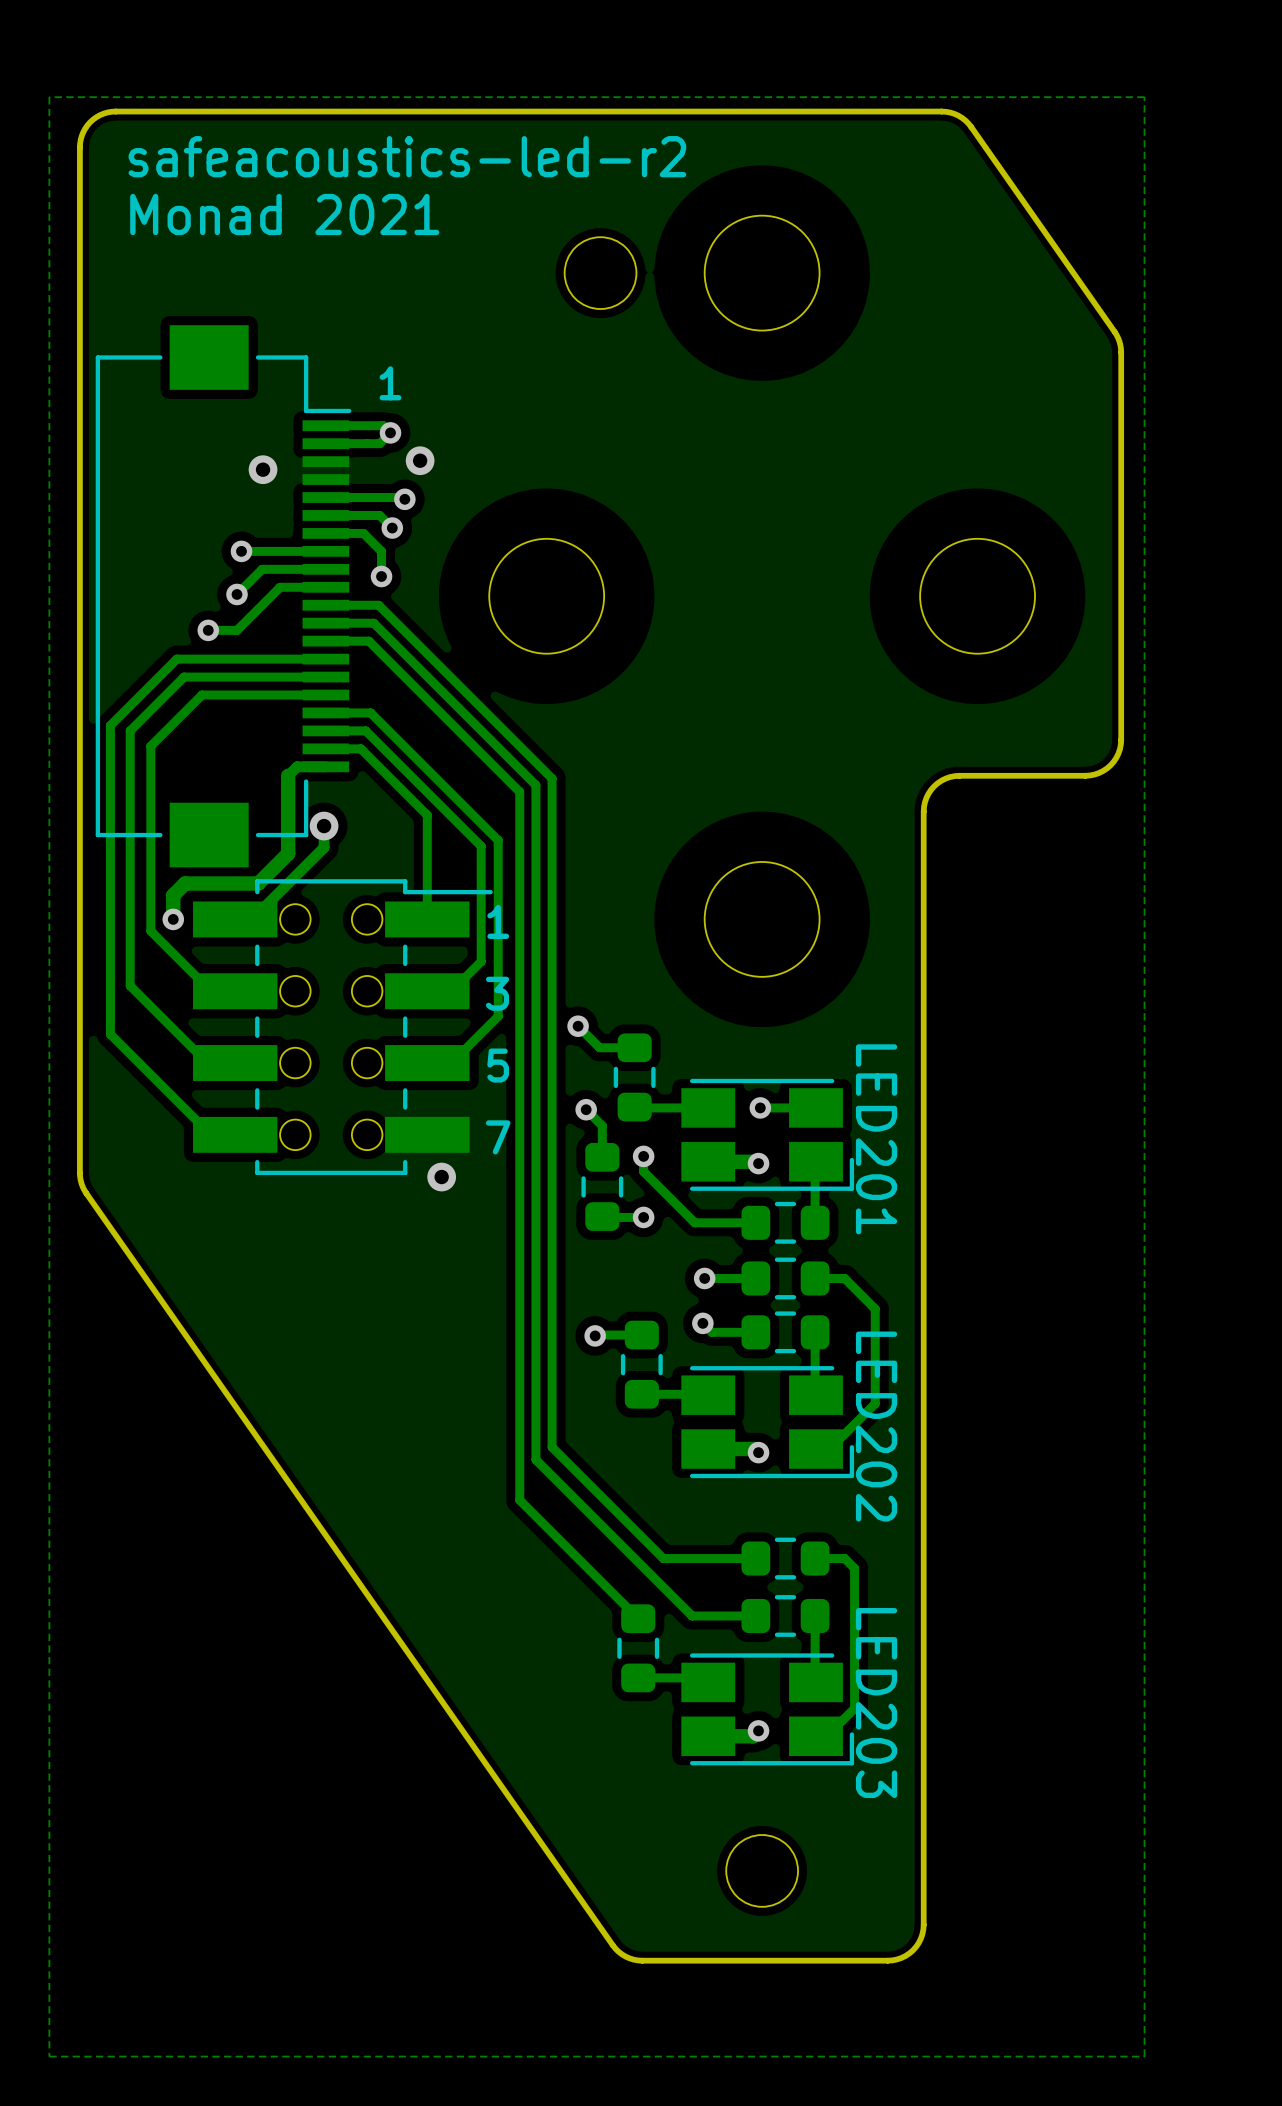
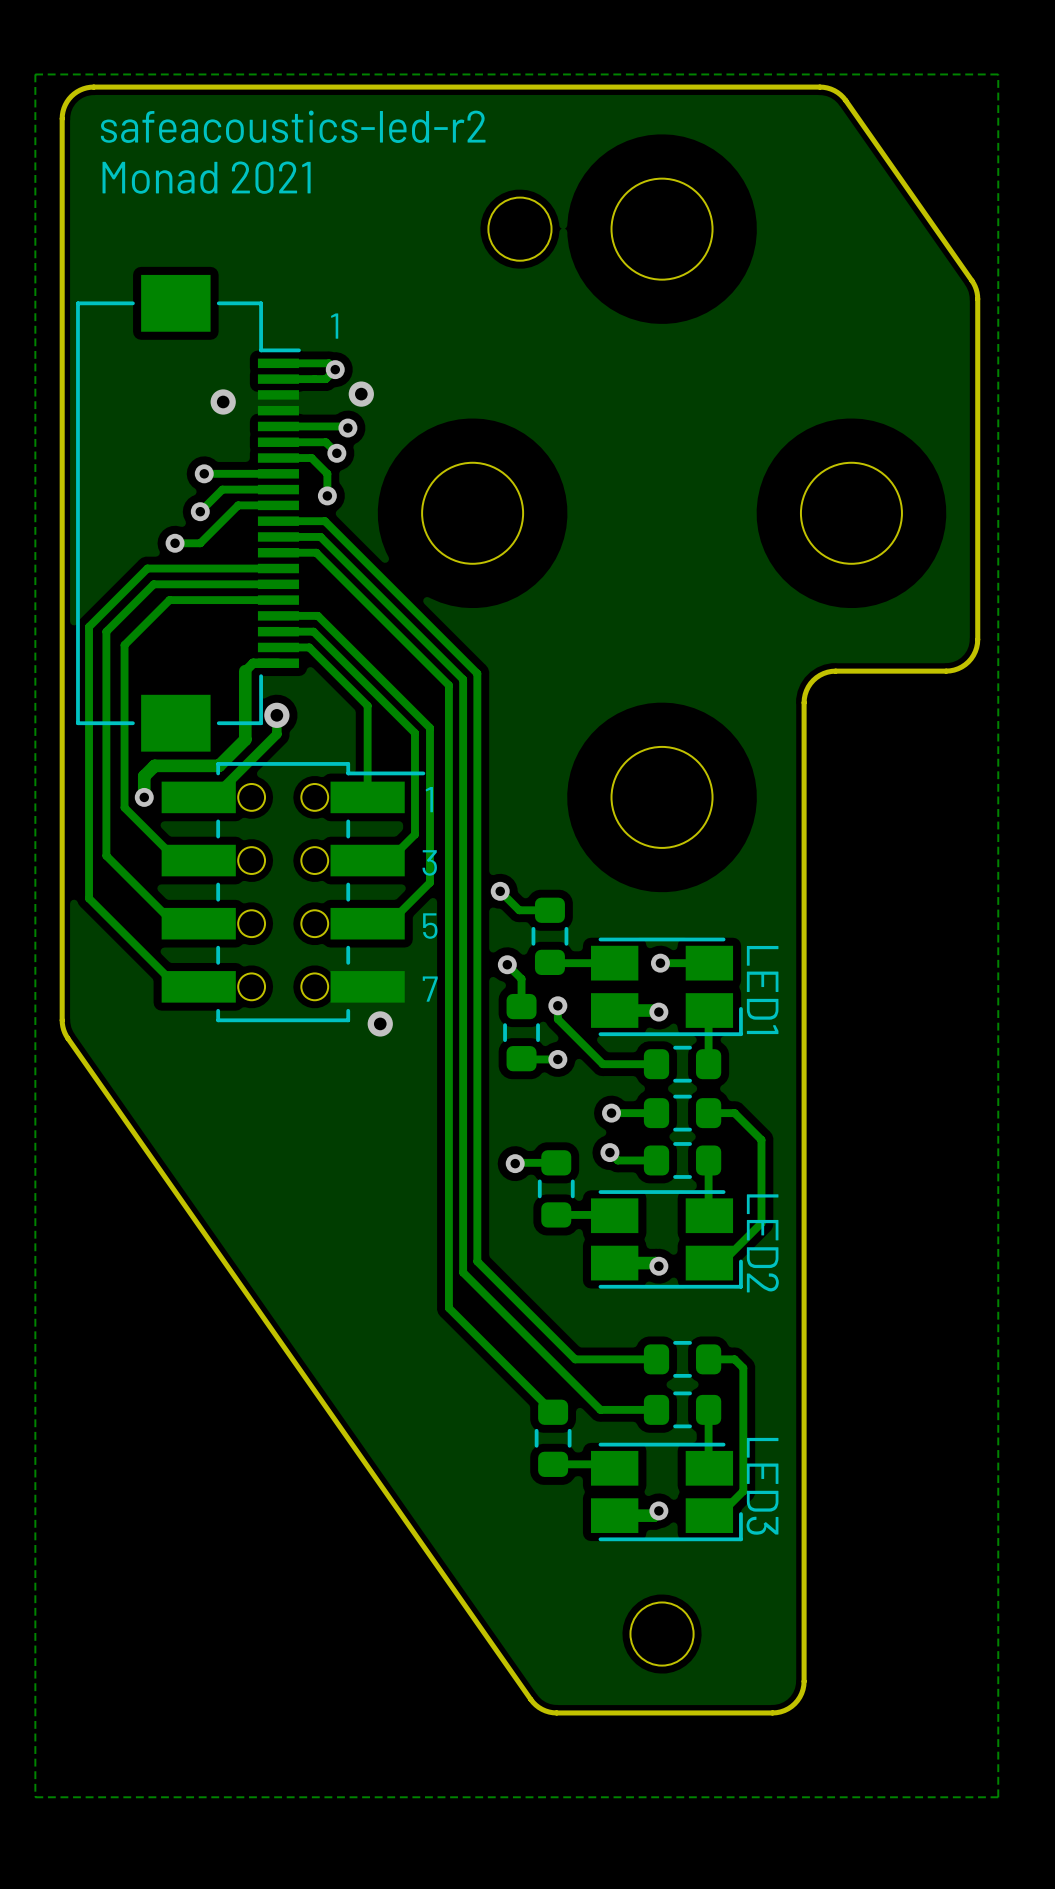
LED201 name: LED201 (876, 1139) -> LED1 (762, 990)
LED202 name: LED202 (876, 1426) -> LED2 (762, 1243)
LED203 name: LED203 (876, 1703) -> LED3 (762, 1486)

